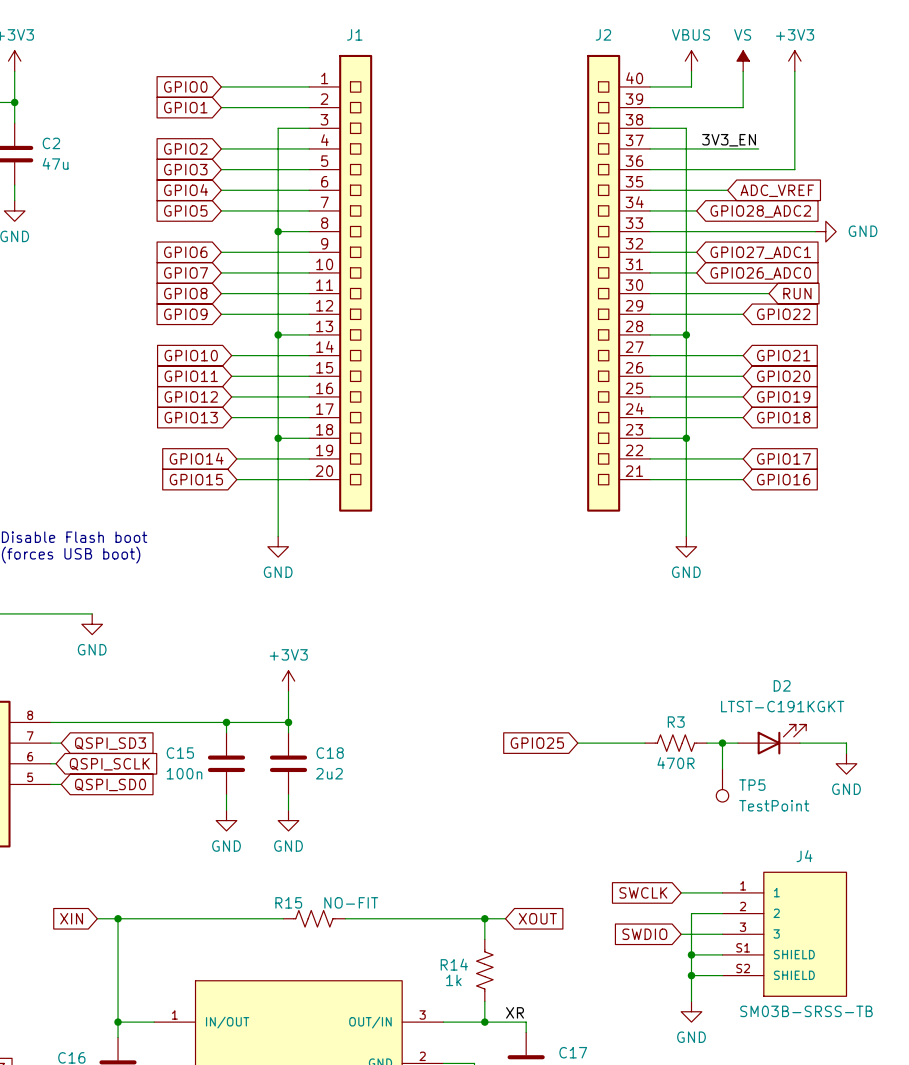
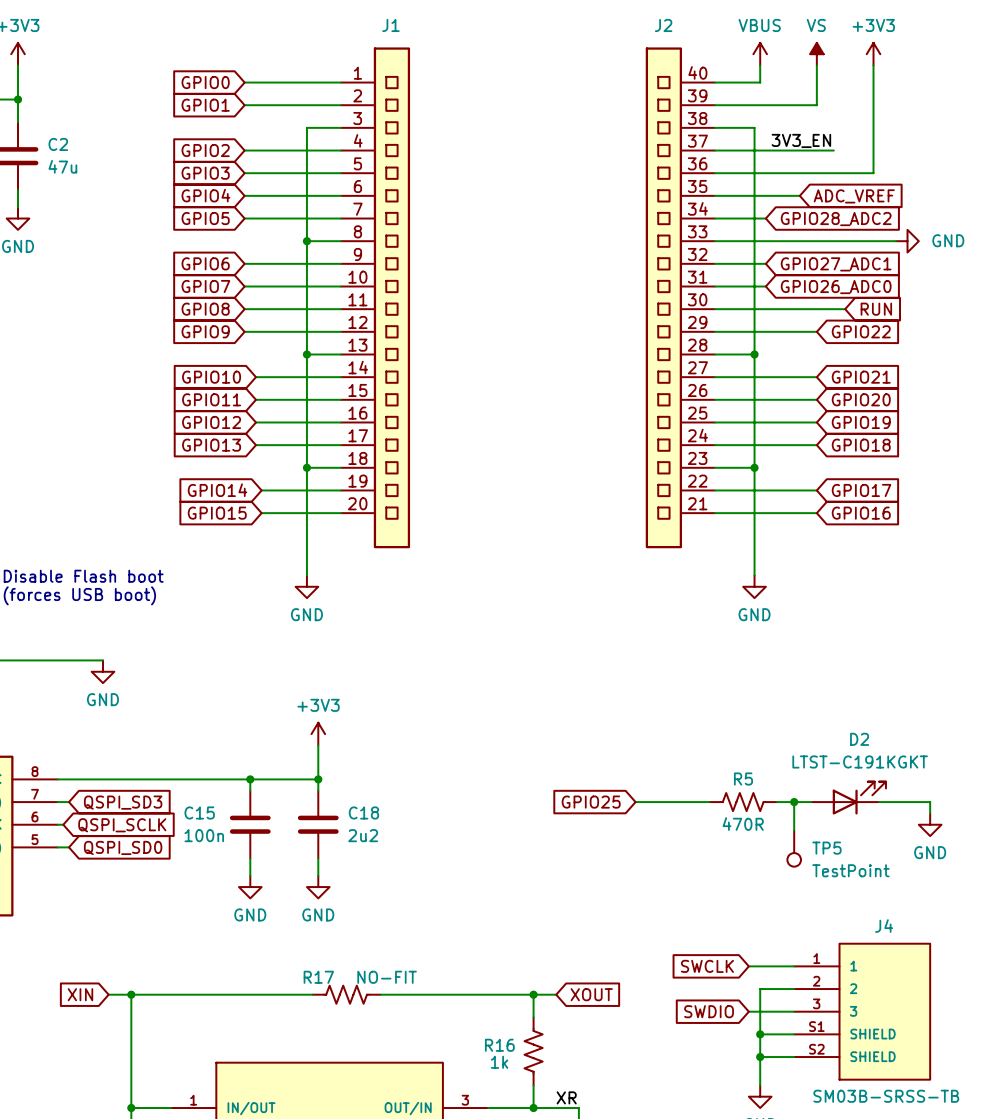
R3 name: R3 (676, 722) -> R5 (743, 778)
R15 name: R15 (288, 902) -> R17 (318, 977)
R14 name: R14 (454, 964) -> R16 (499, 1045)

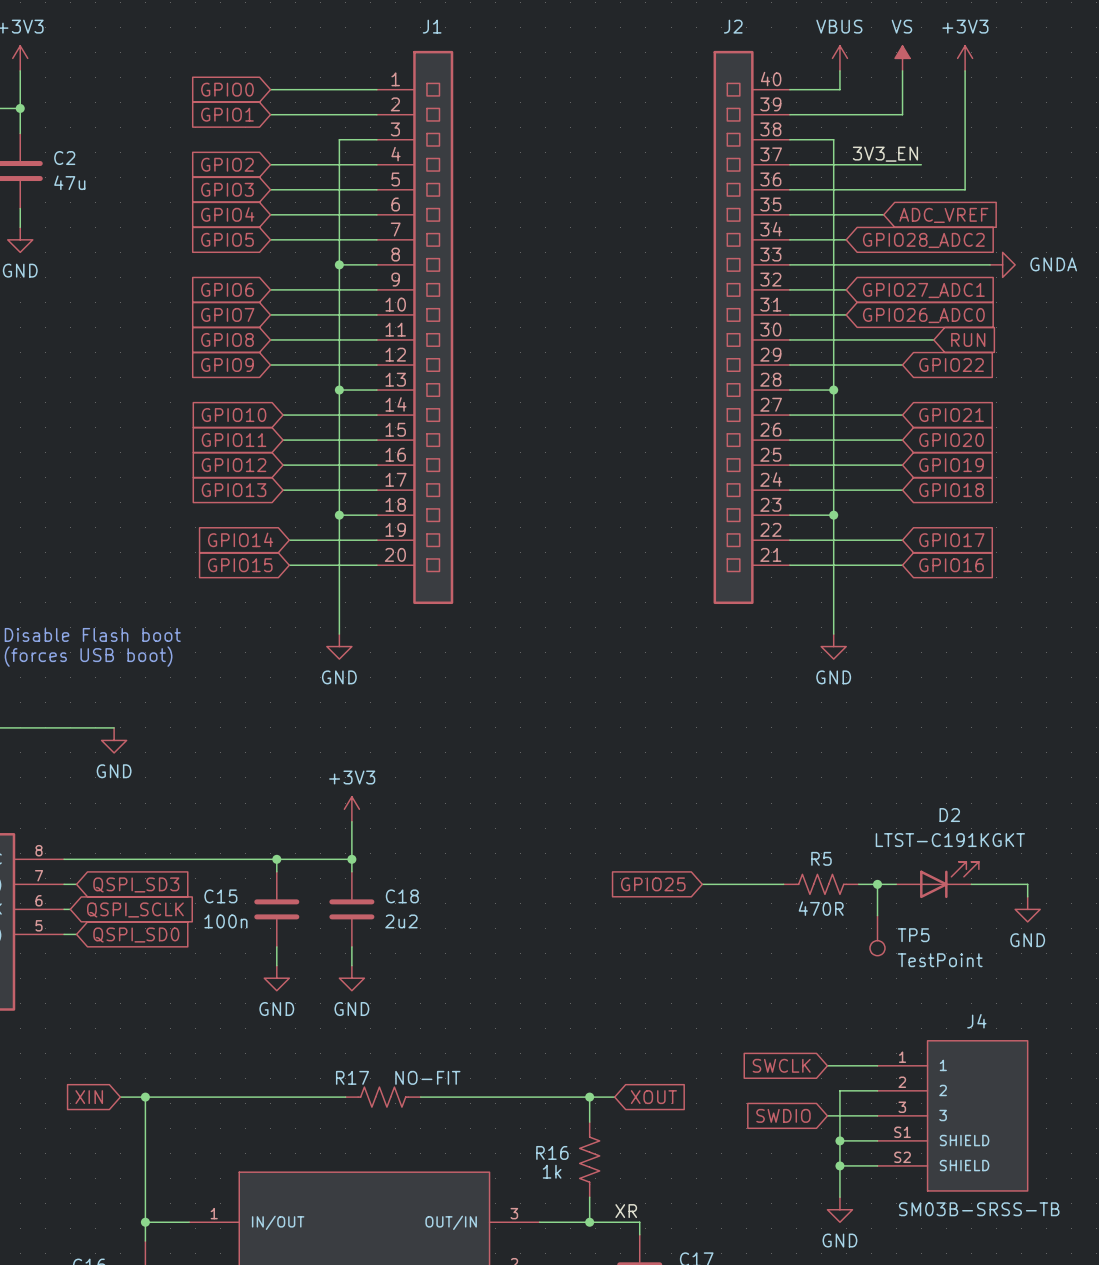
power symbol: GND (907, 241) -> GNDA (1002, 264)

